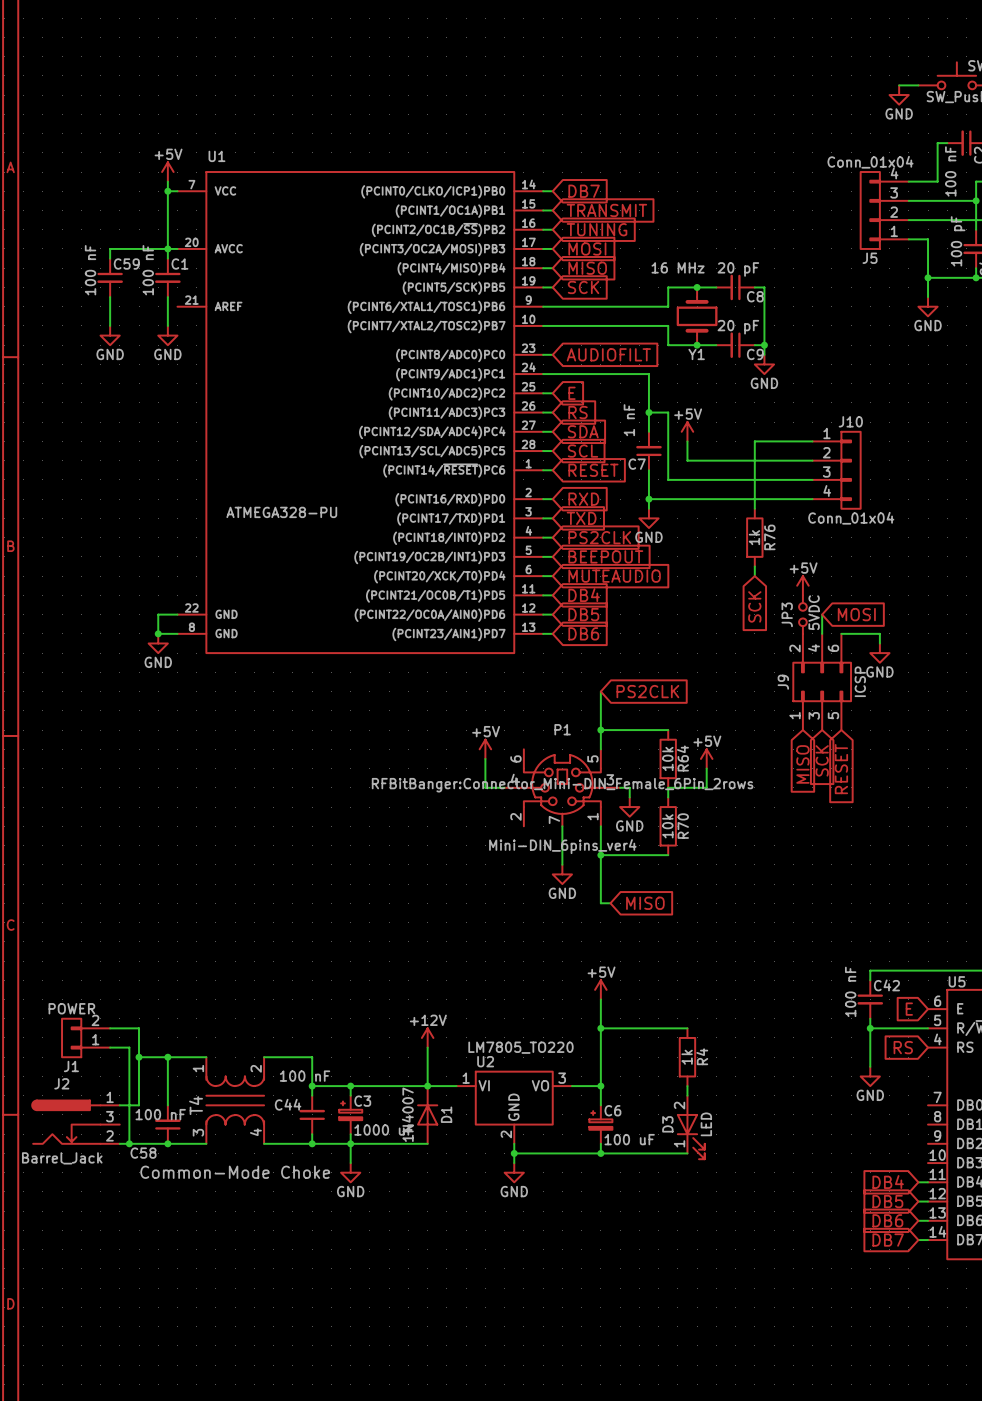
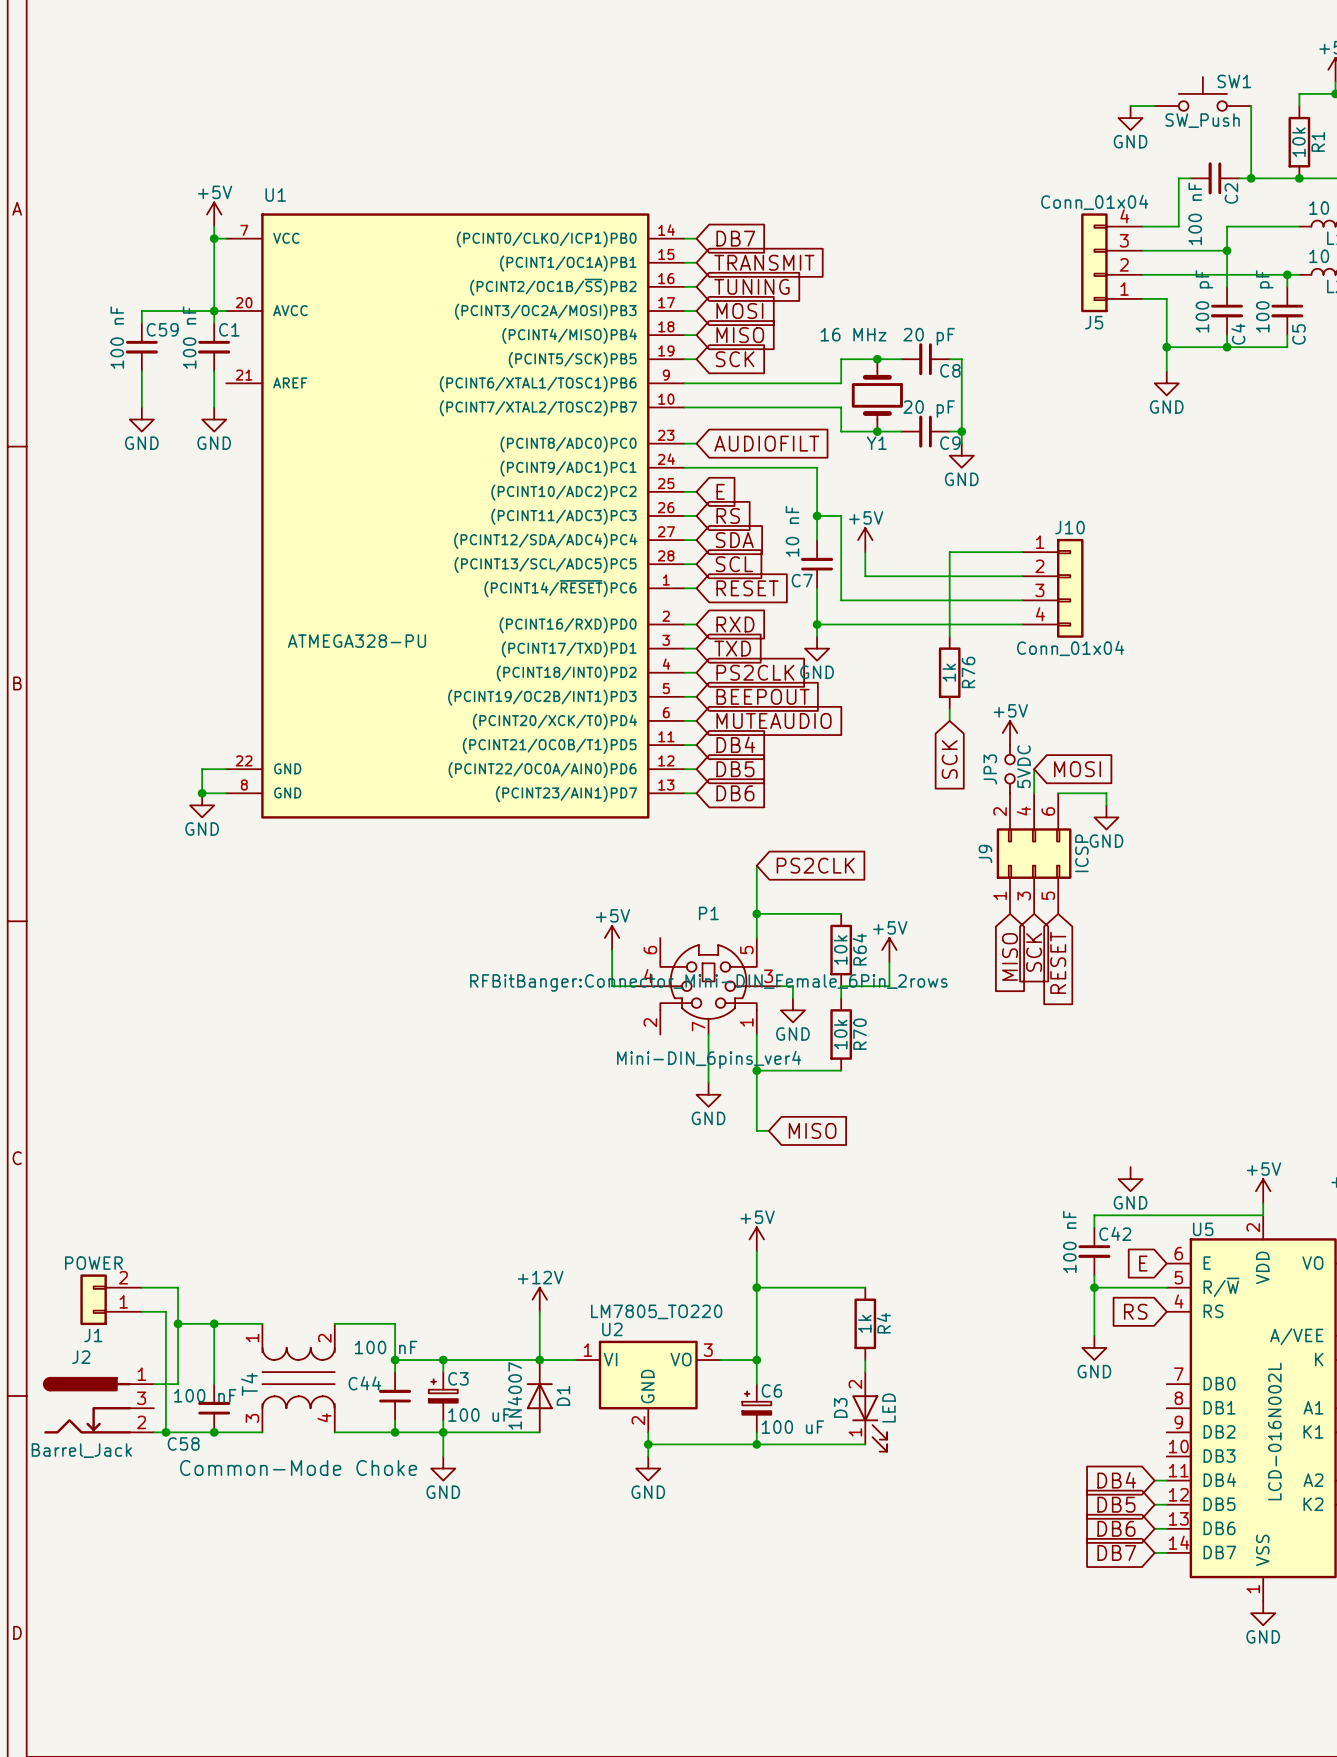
C7 value: 1 nF (629, 420) -> 10 nF (792, 531)
power symbol: none -> GND (1130, 1179)
C3 value: 1000 uF (384, 1129) -> 100 uF (479, 1415)

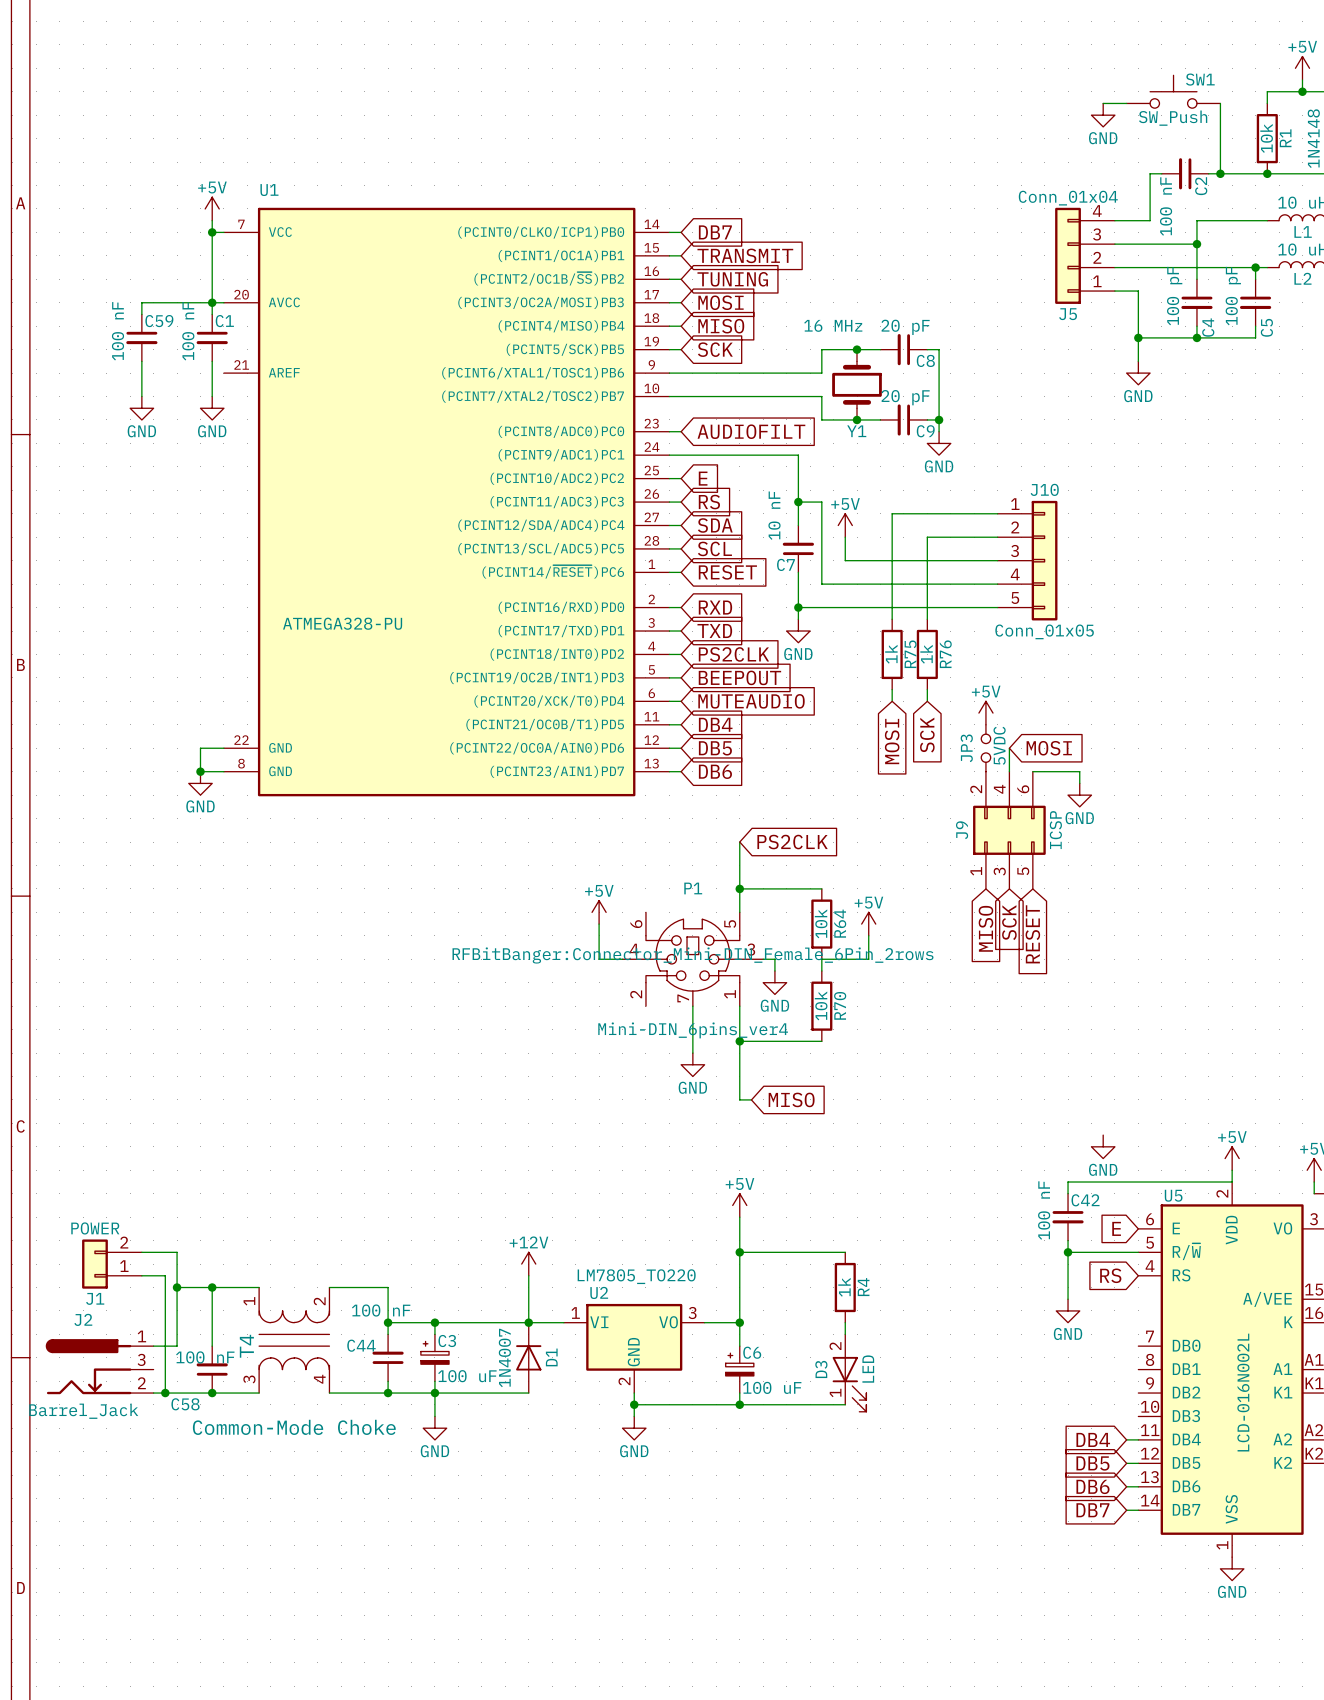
wire: none -> (997, 513) (892, 513) (892, 619)
J10 symbol: [1022, 538, 1084, 638] -> [997, 500, 1058, 621]
J10 value: Conn_01x04 (1070, 648) -> Conn_01x05 (1044, 631)
R75: none -> 1k (892, 654)
wire: none -> (892, 689) (892, 701)
global label: none -> MOSI (892, 741)

